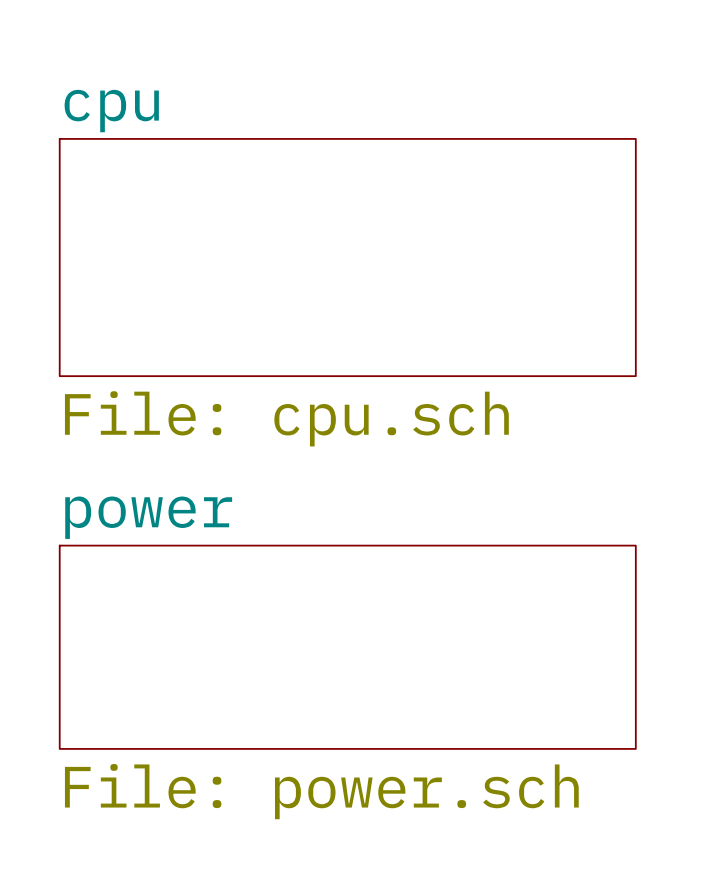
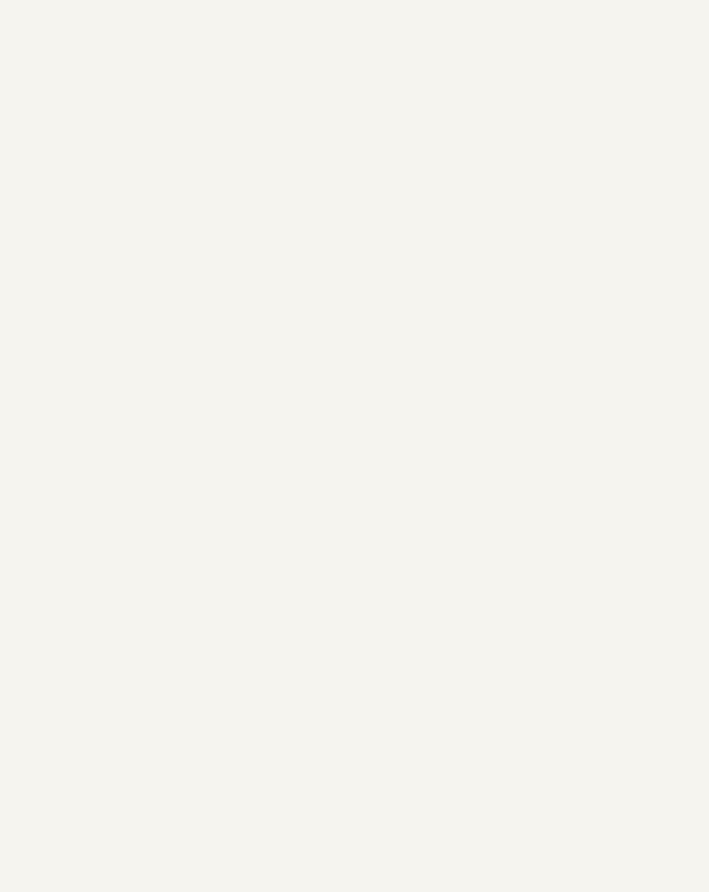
sheet cpu: File: cpu.sch (347, 257) -> none
sheet power: File: power.sch (347, 647) -> none

